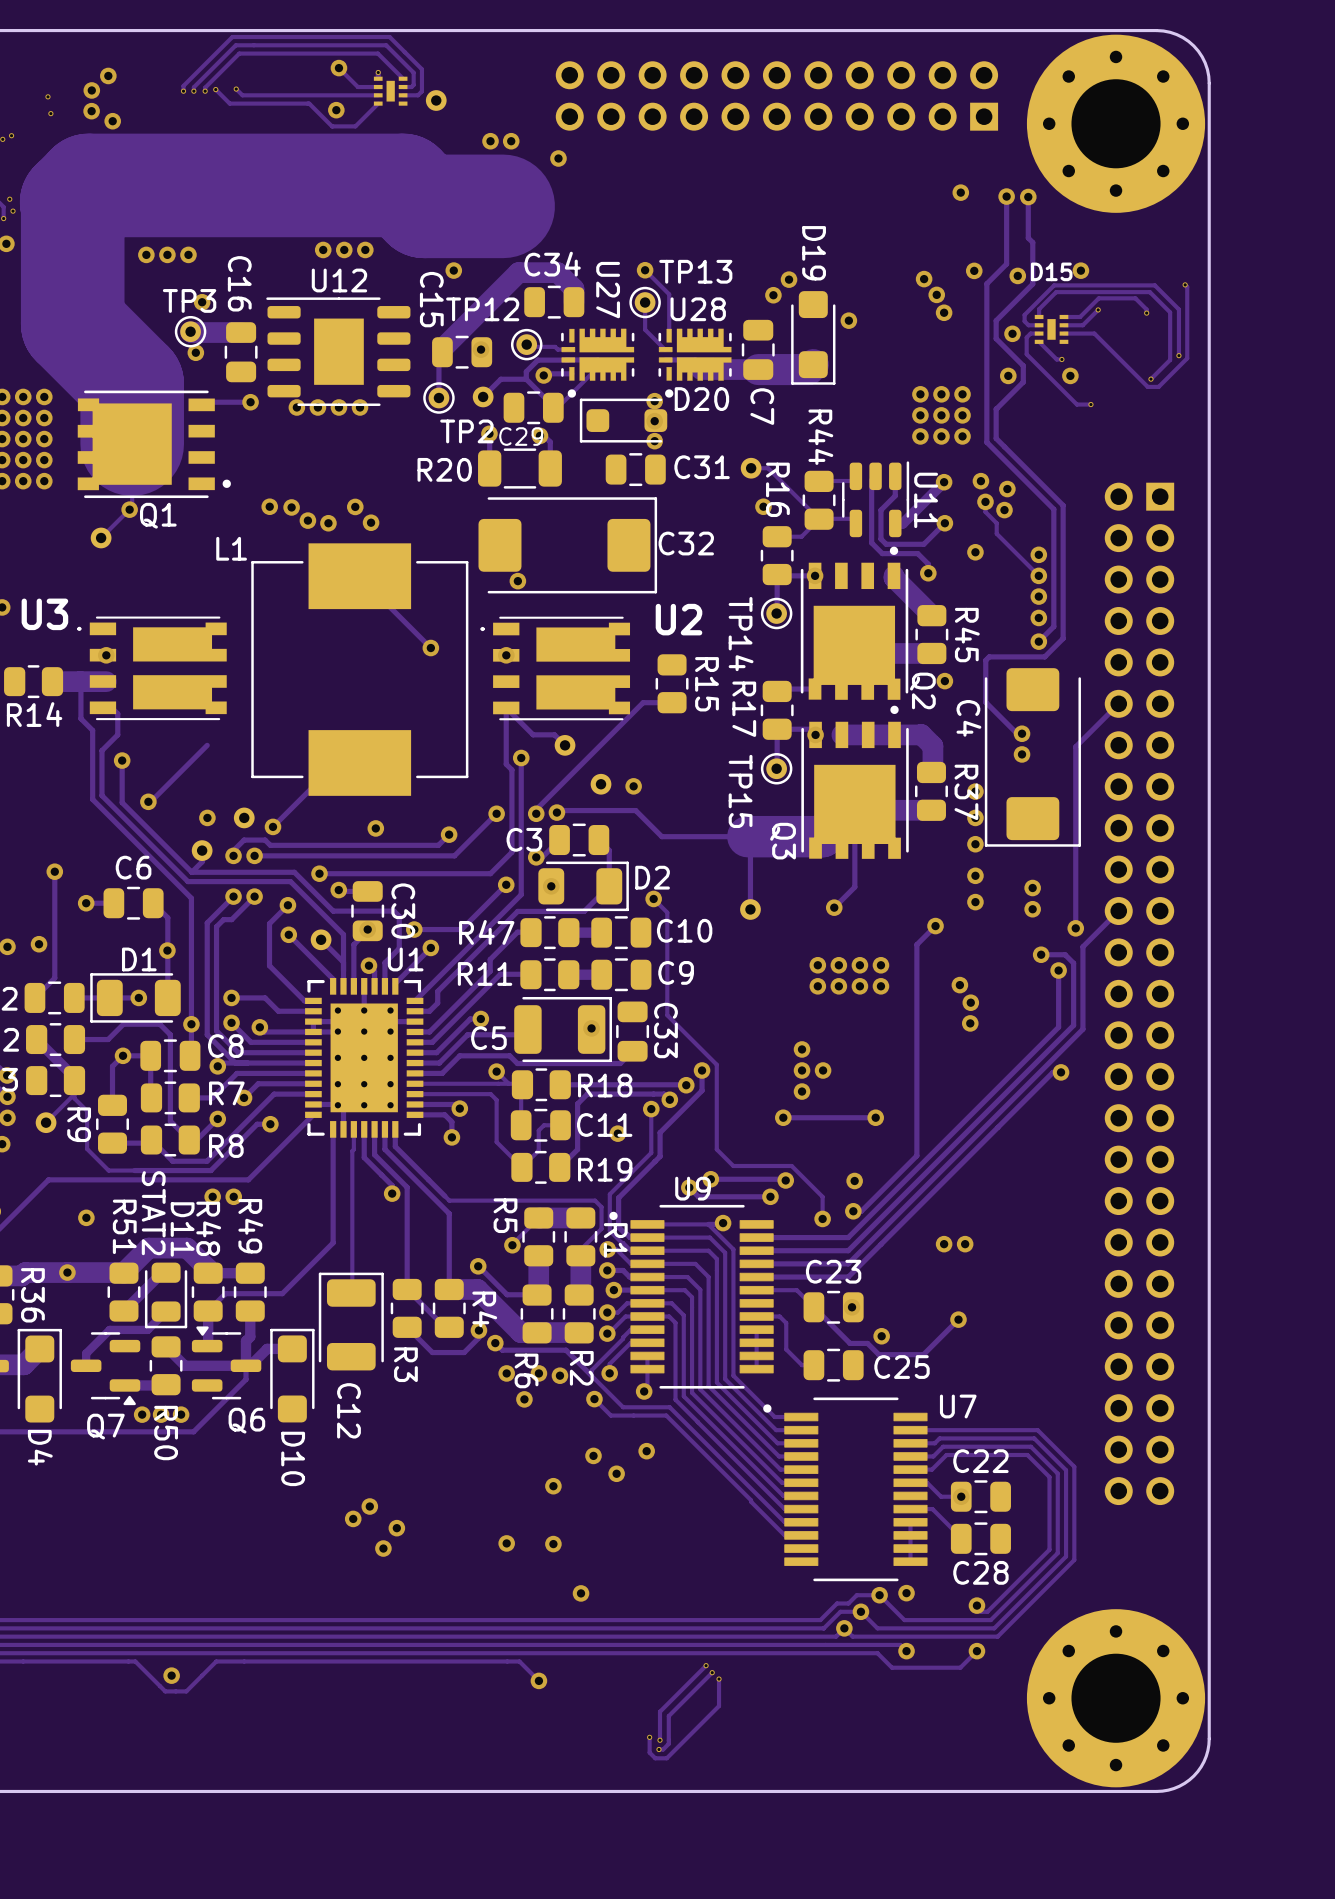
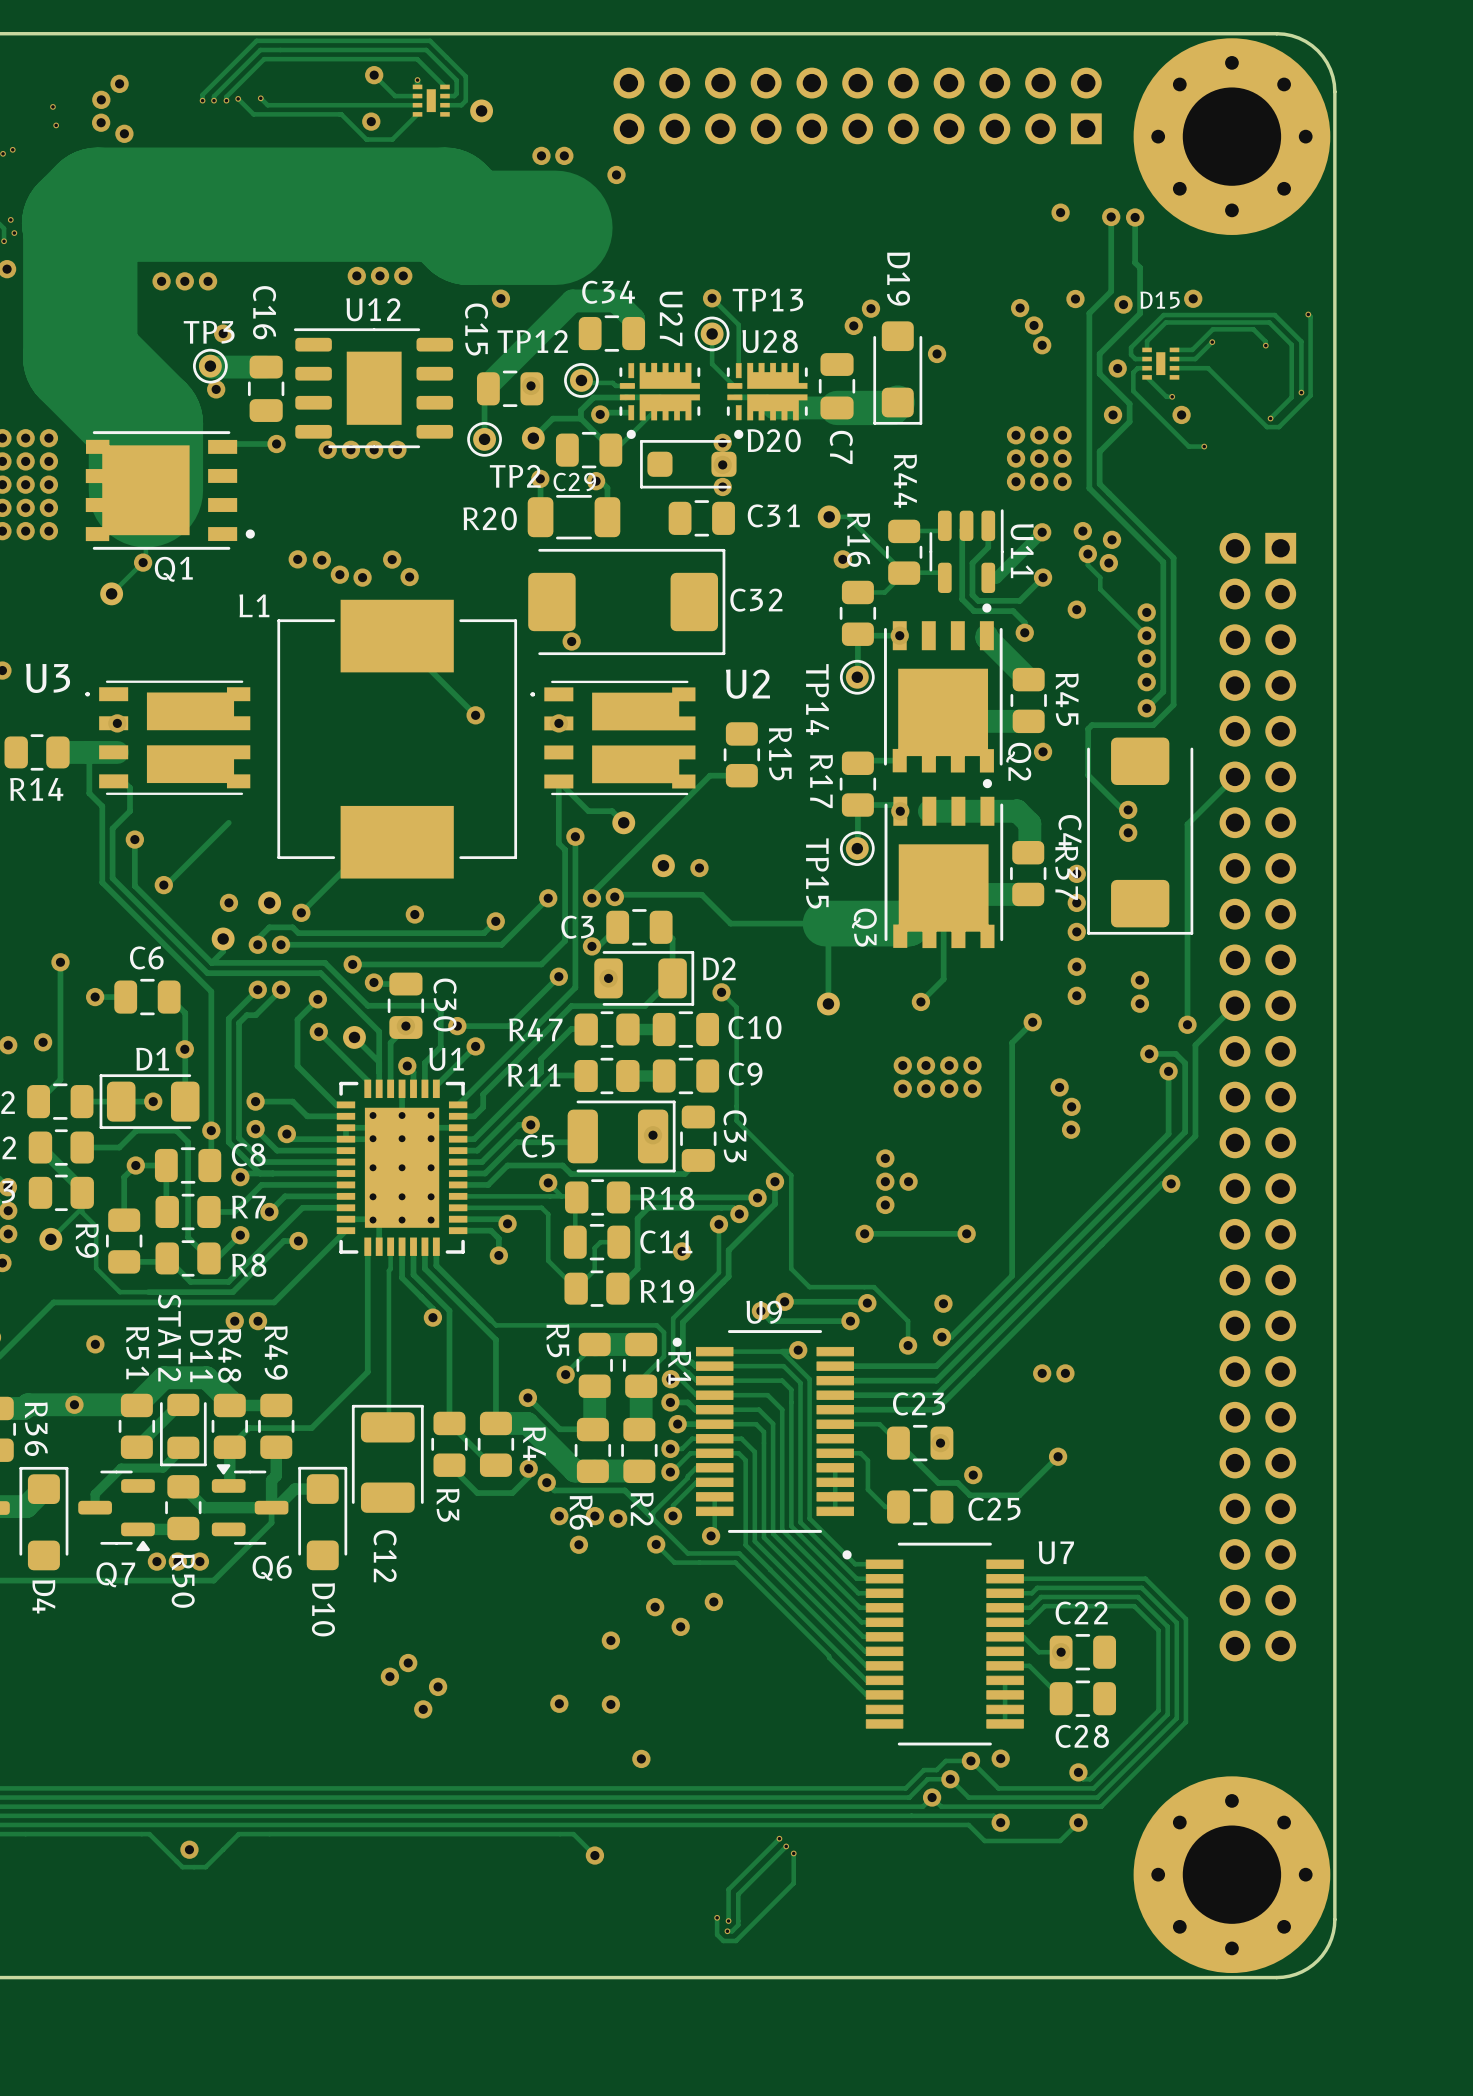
C4 name position: C4 (968, 718) -> C4 (1070, 831)

